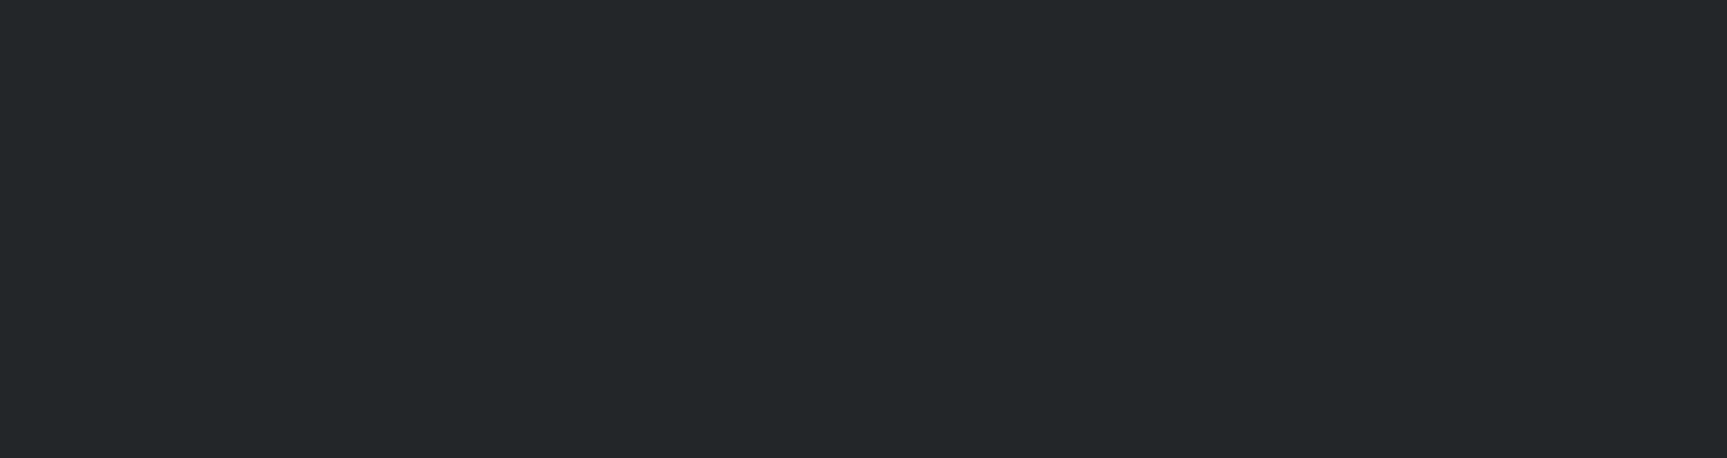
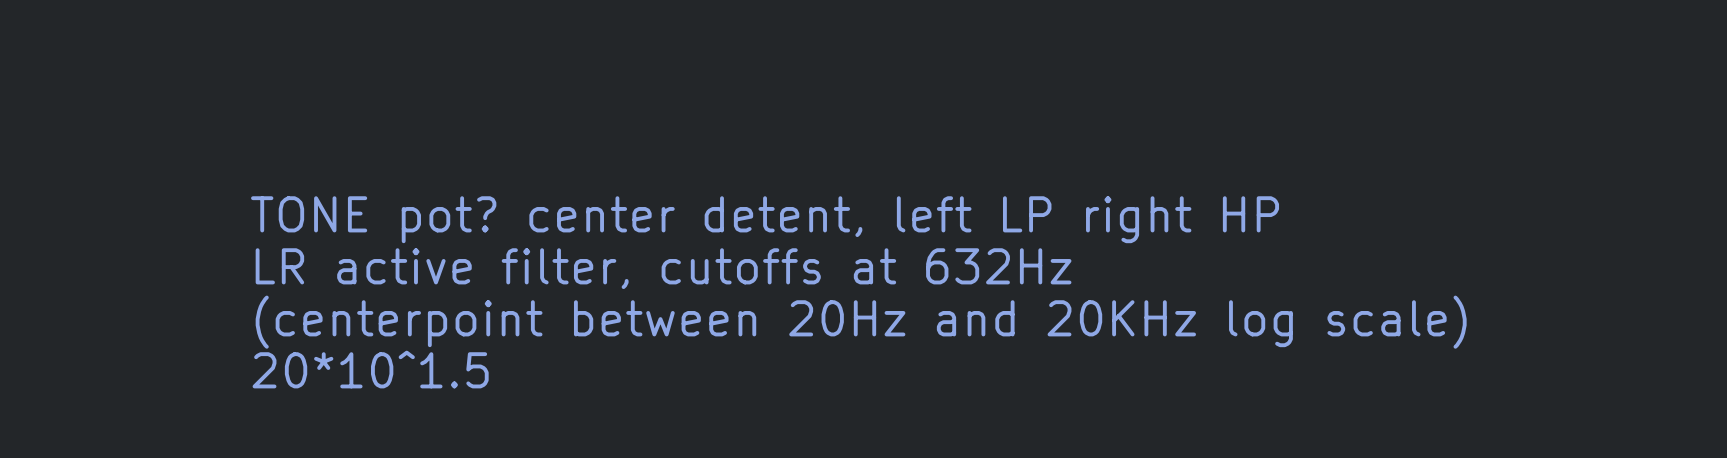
text: none -> TONE pot? center detent, left LP right HP (765, 219)
text: none -> LR active filter, cutoffs at 632Hz (663, 268)
text: none -> (centerpoint between 20Hz and 20KHz log scale) (861, 322)
text: none -> 20*10^1.5 (370, 369)

